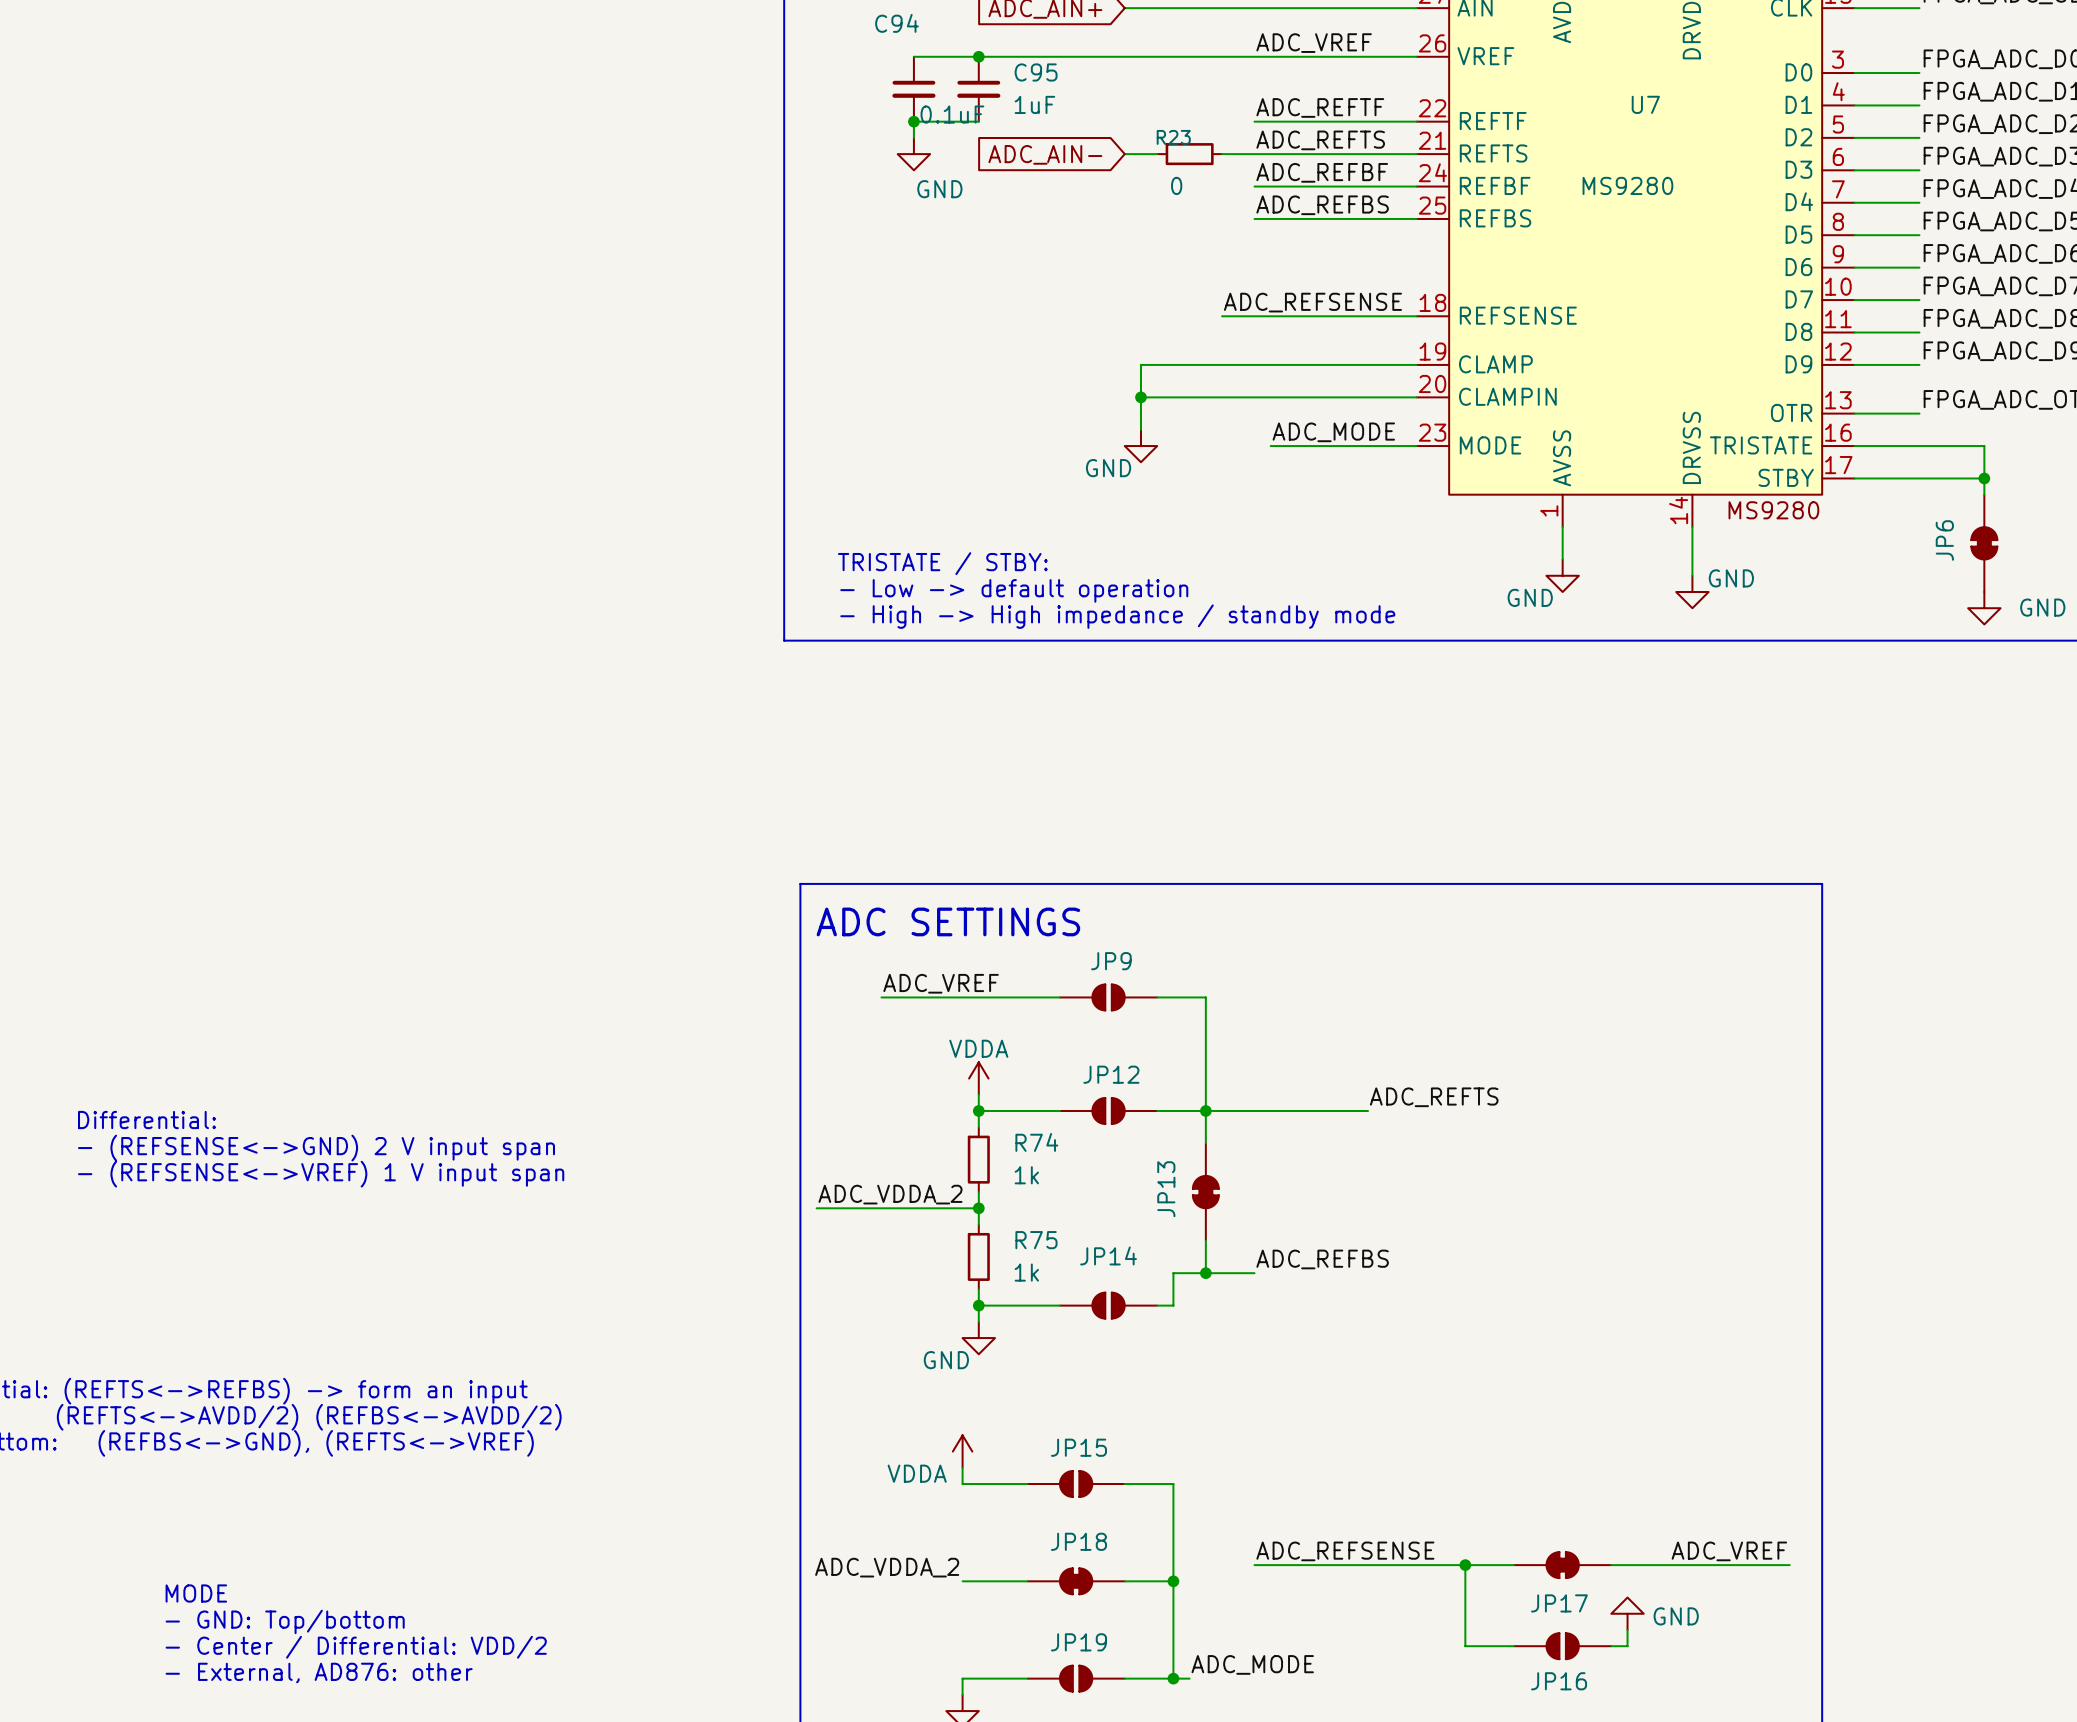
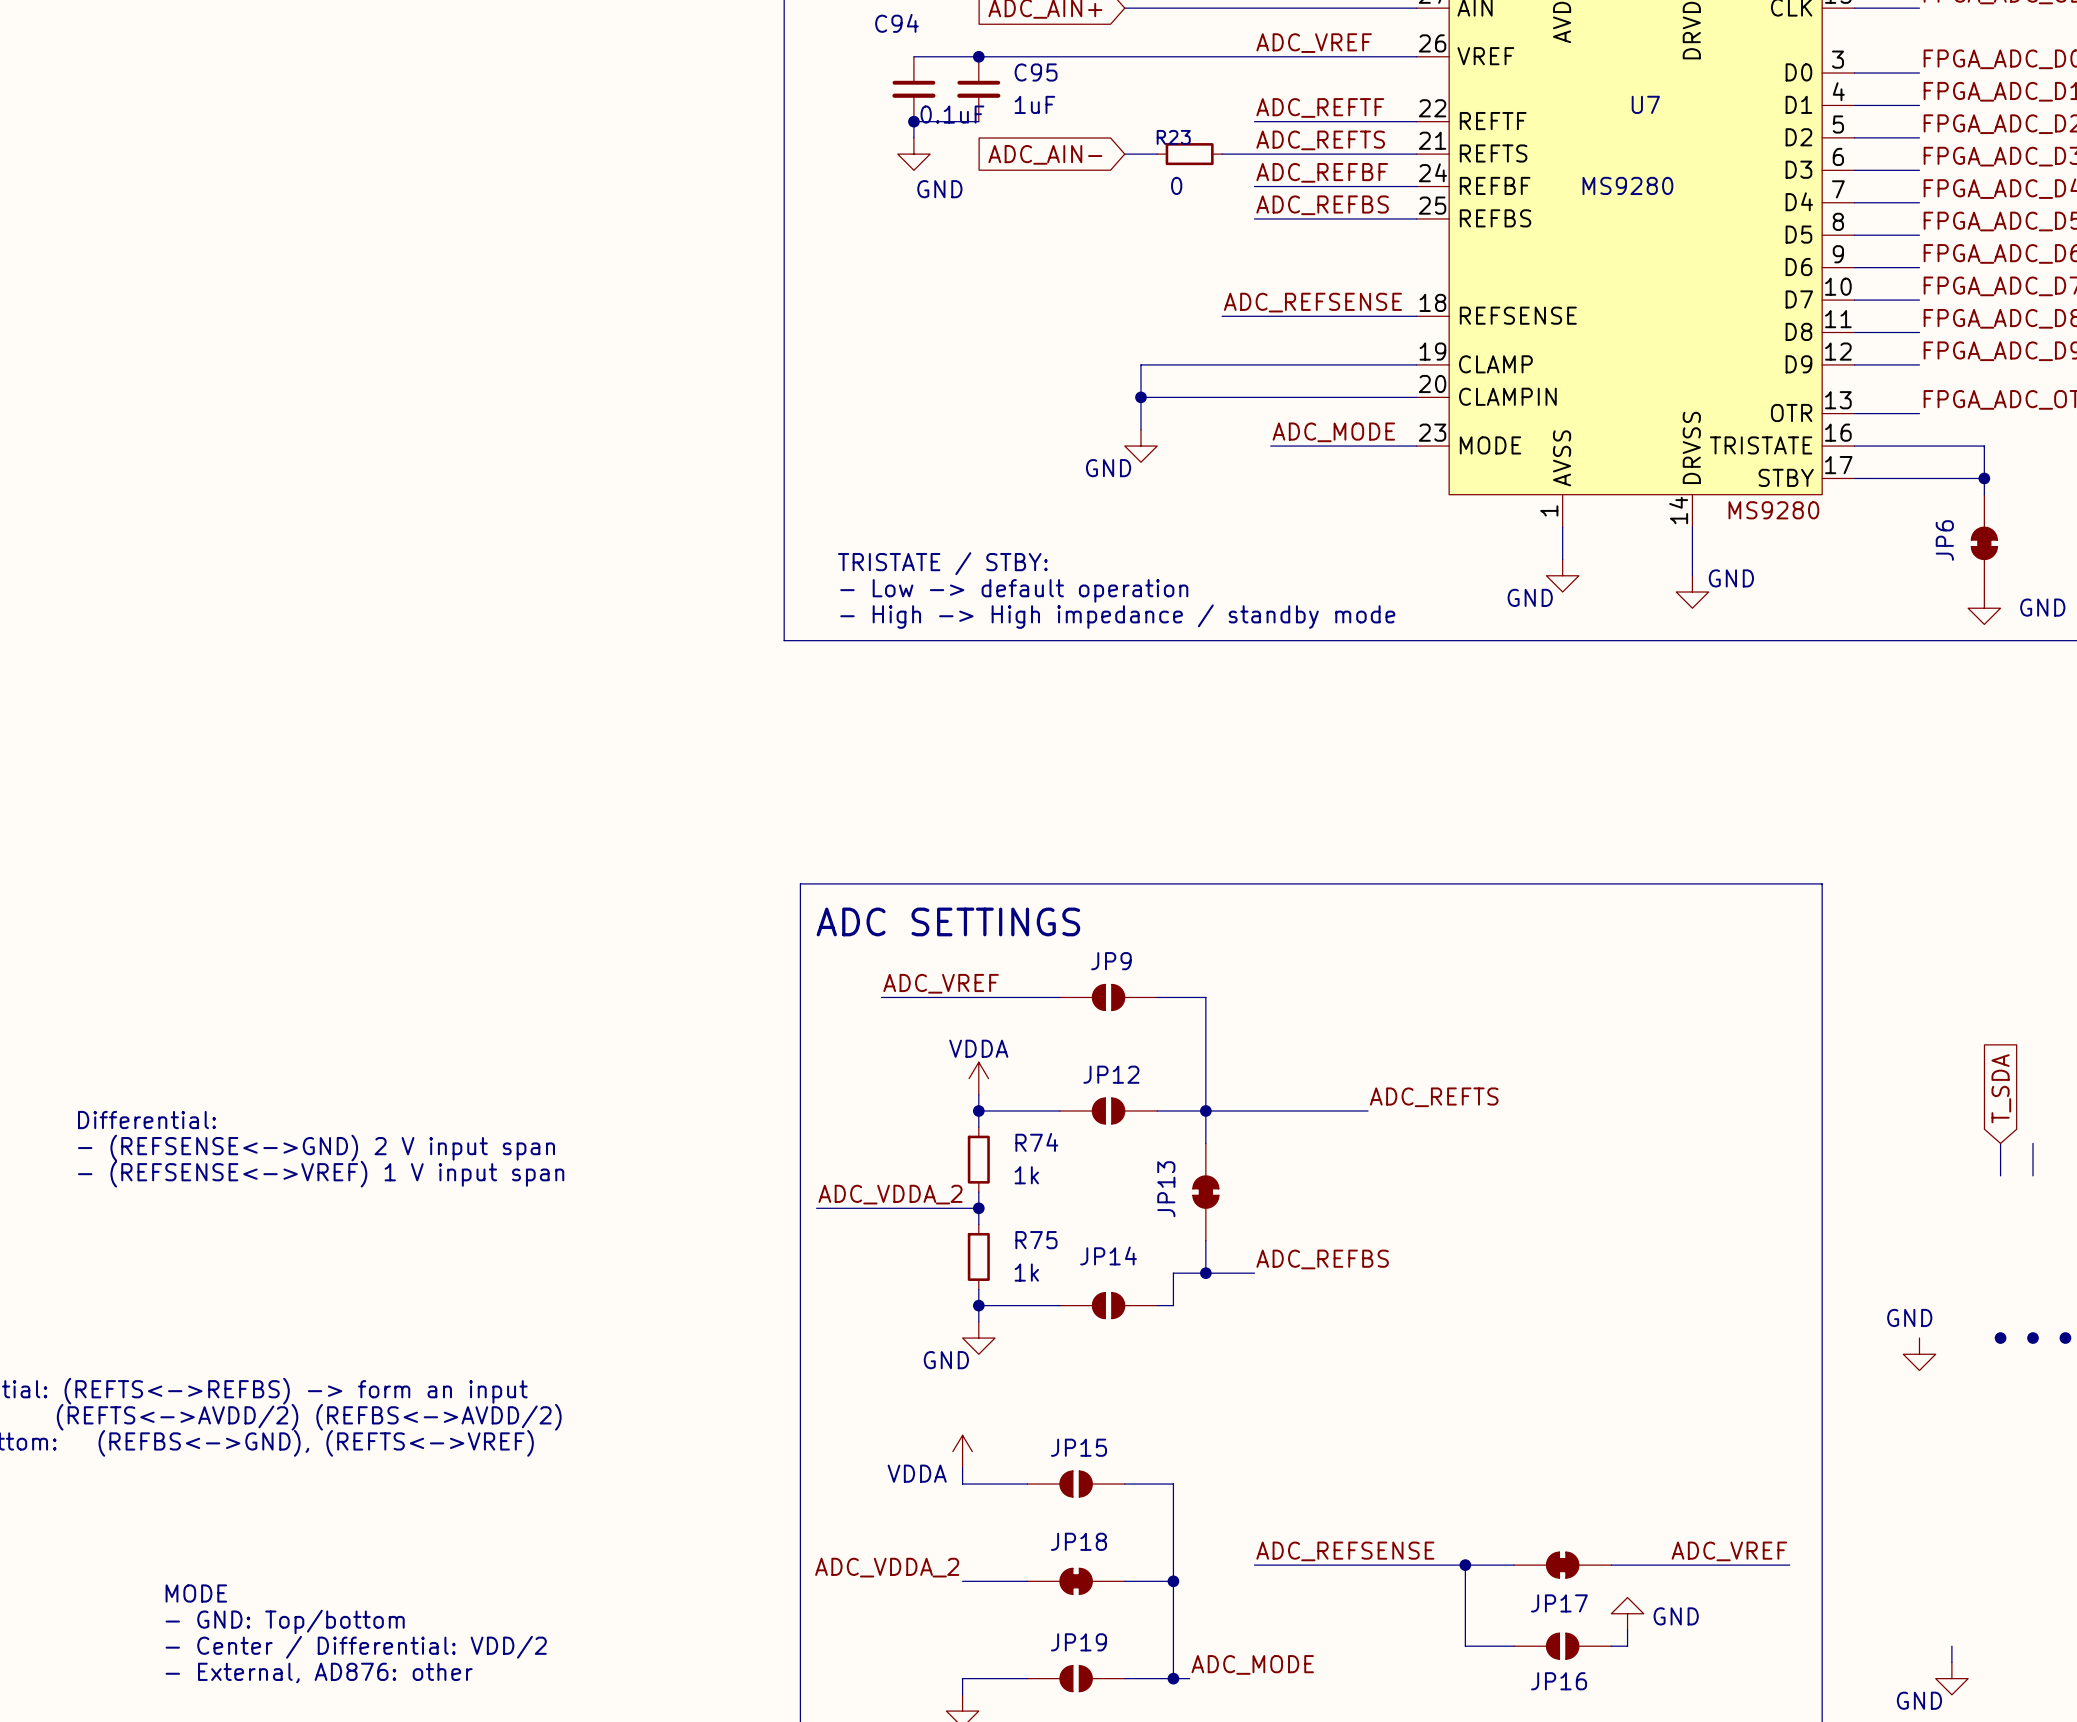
global label: none -> T_SDA (2001, 1088)
wire: none -> (2000, 1143) (2000, 1175)
wire: none -> (2033, 1143) (2033, 1175)
junction: none -> (2000, 1338)
junction: none -> (2033, 1338)
junction: none -> (2065, 1338)
power symbol: none -> GND (1919, 1354)
wire: none -> (1951, 1646) (1951, 1662)
power symbol: none -> GND (1951, 1678)

